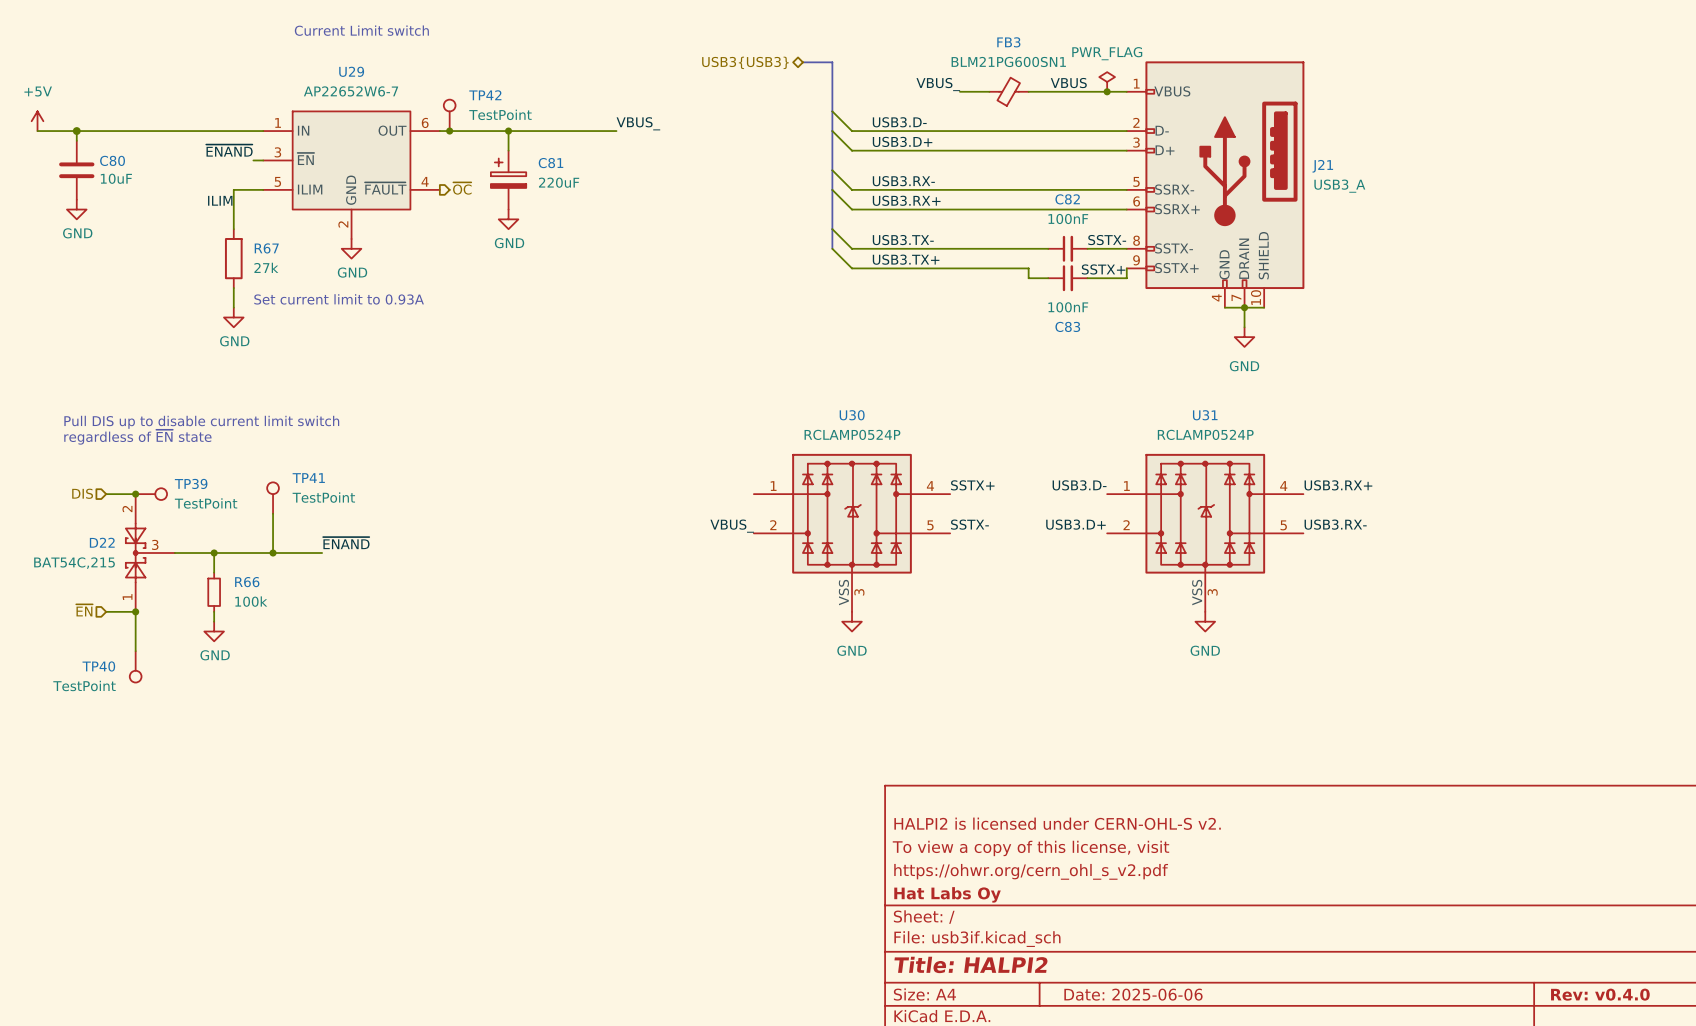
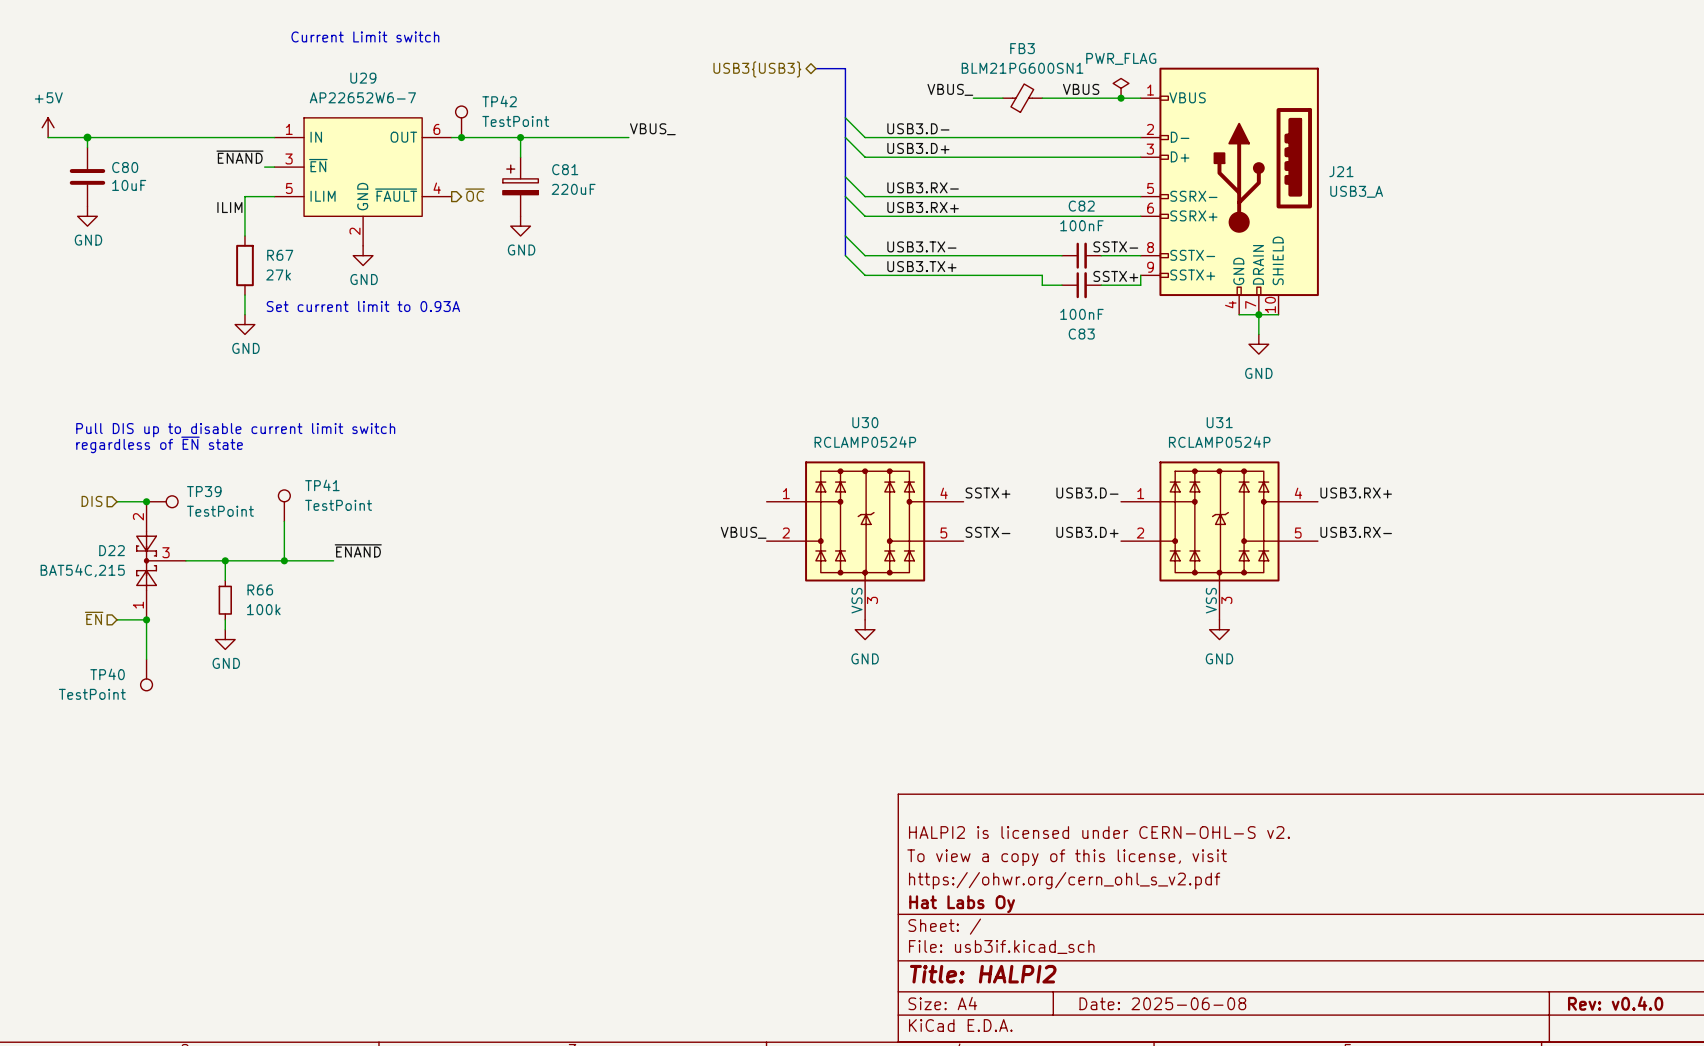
title block: Date: 2025-06-06 (1133, 994) -> Date: 2025-06-08 (1162, 1003)

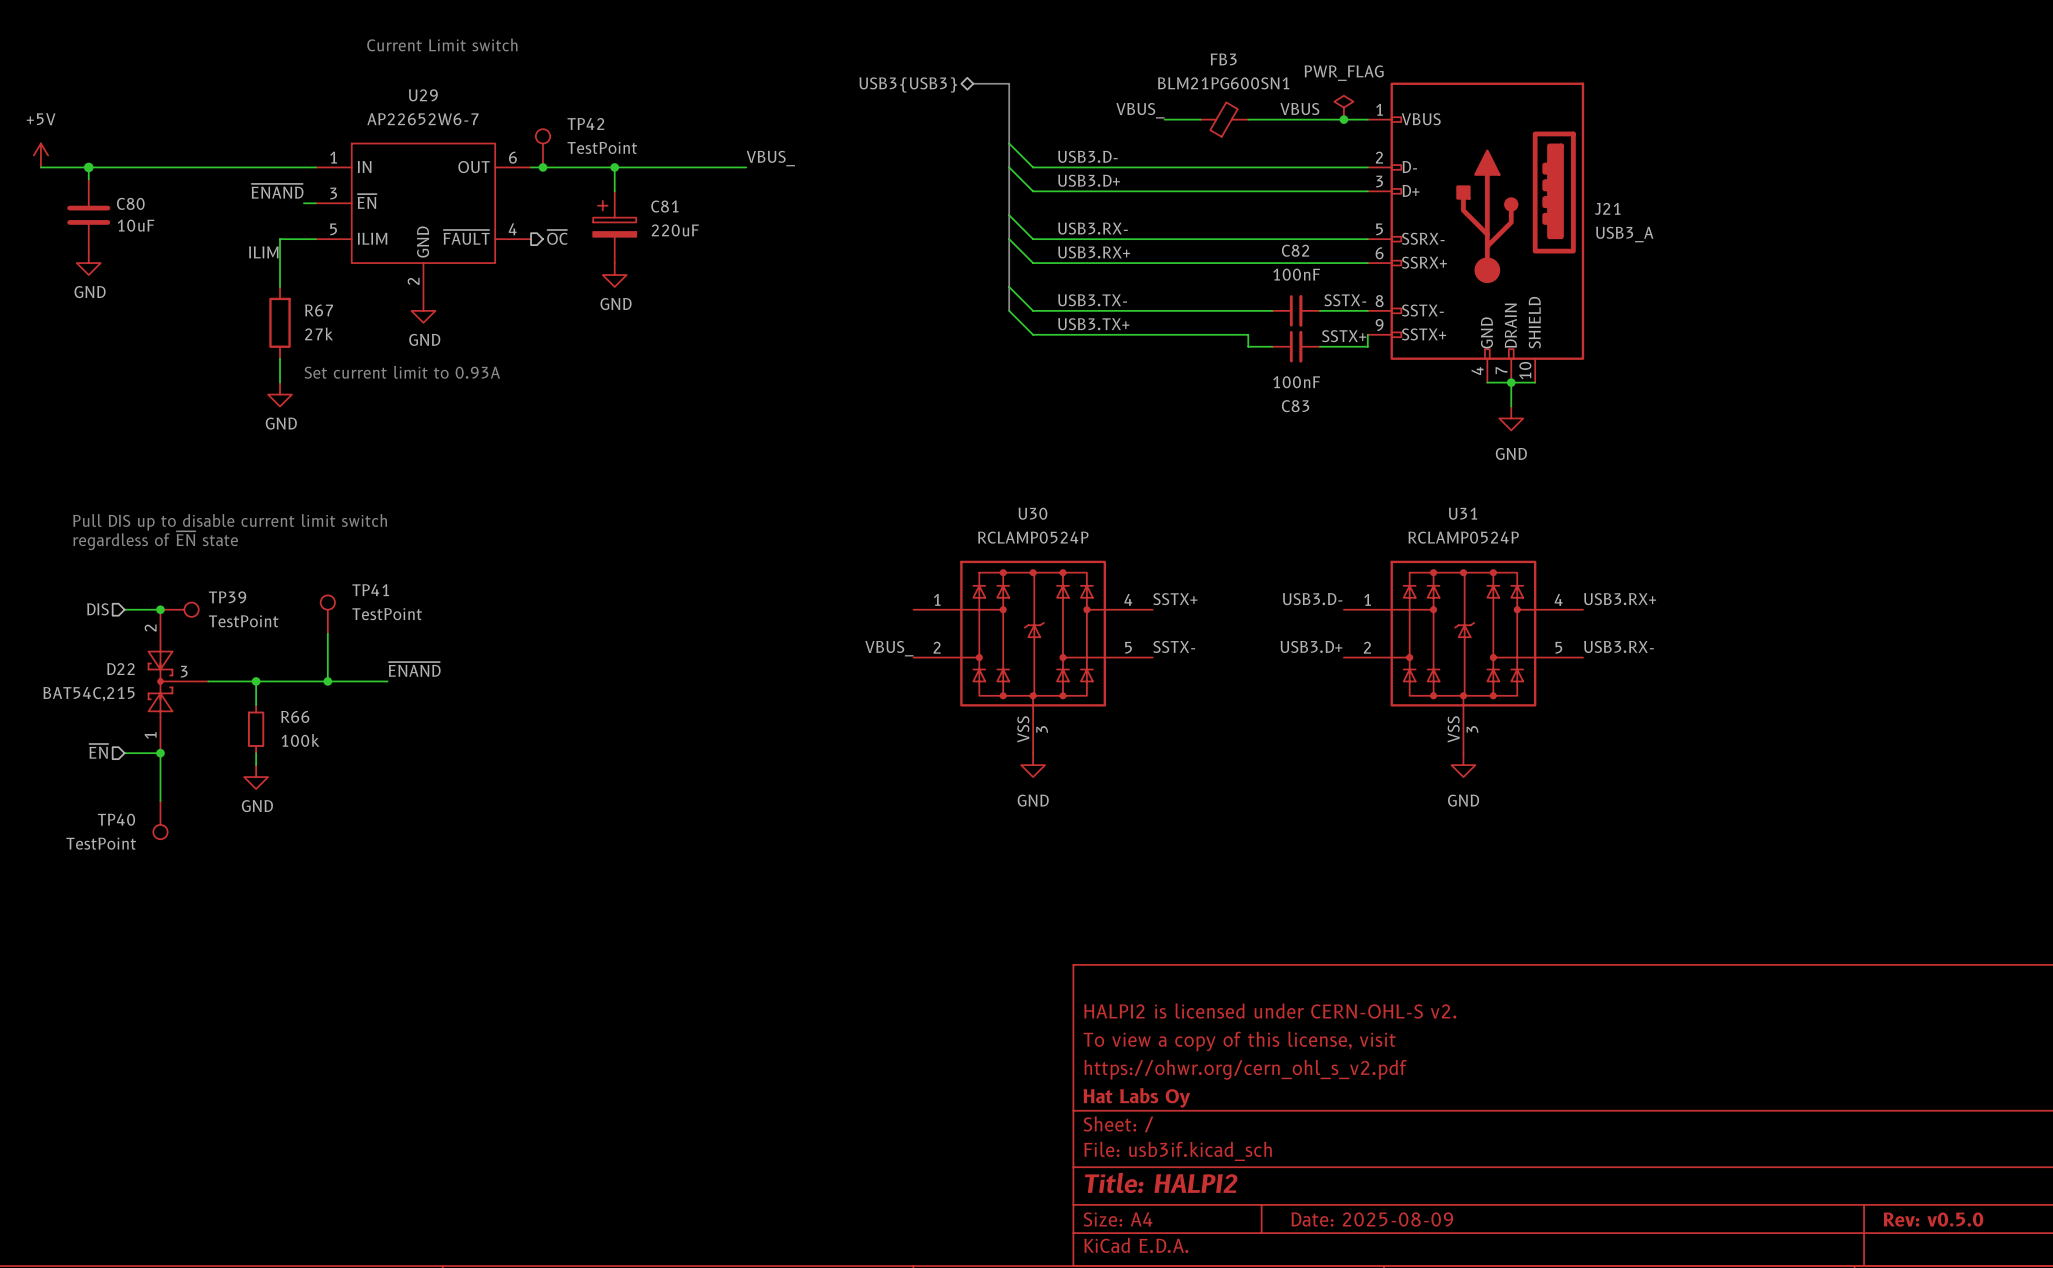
title block: Date: 2025-06-08 (1162, 1003) -> Date: 2025-08-09 (1372, 1219)
title block: Rev: v0.4.0 (1615, 1003) -> Rev: v0.5.0 (1933, 1219)

